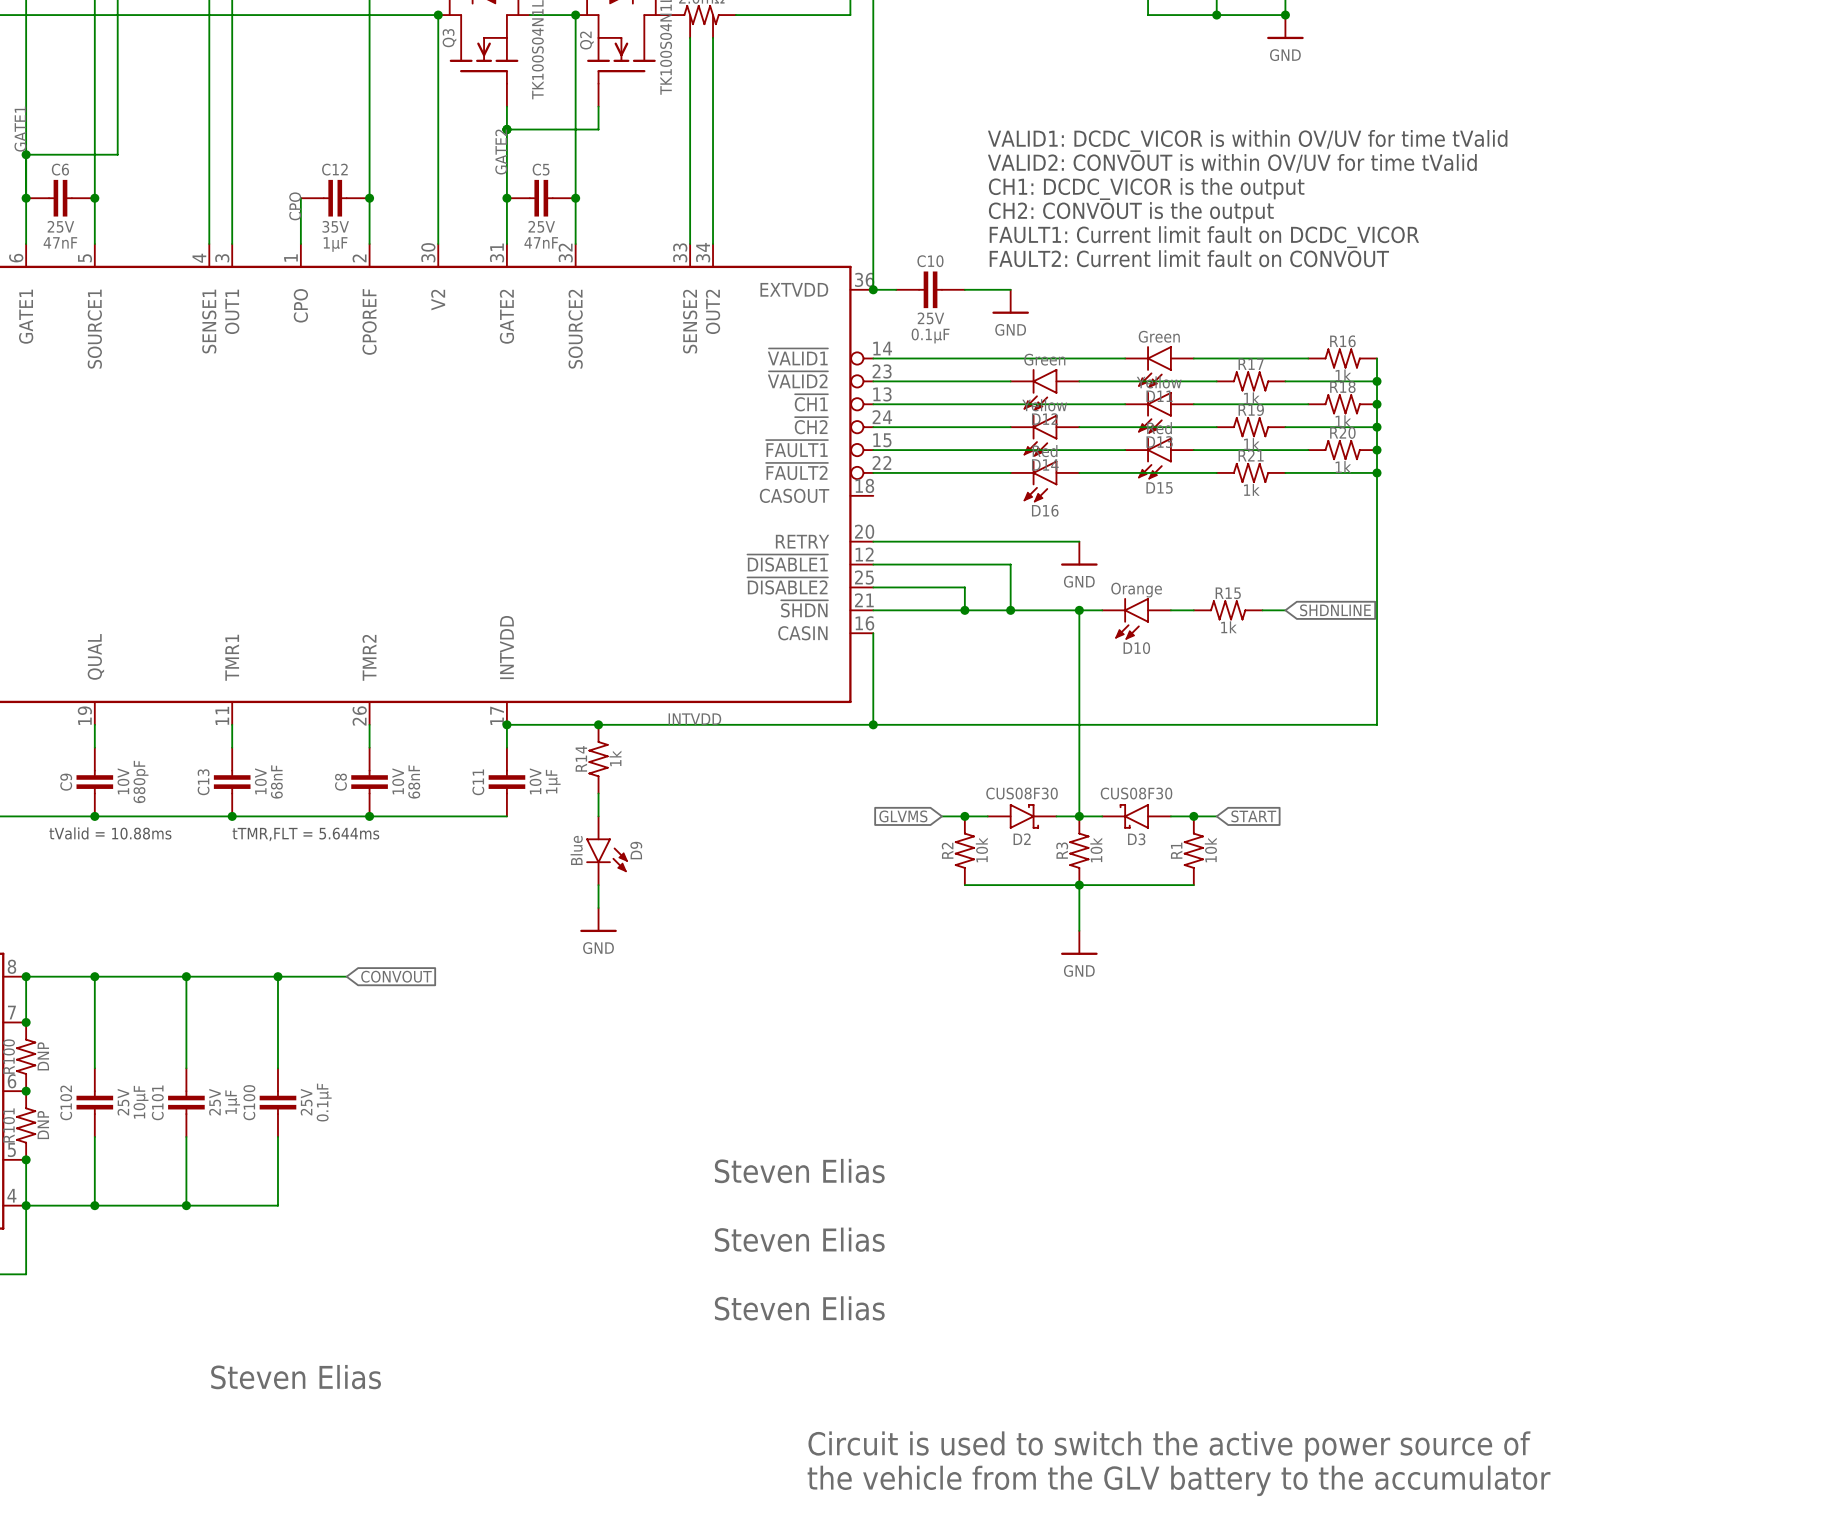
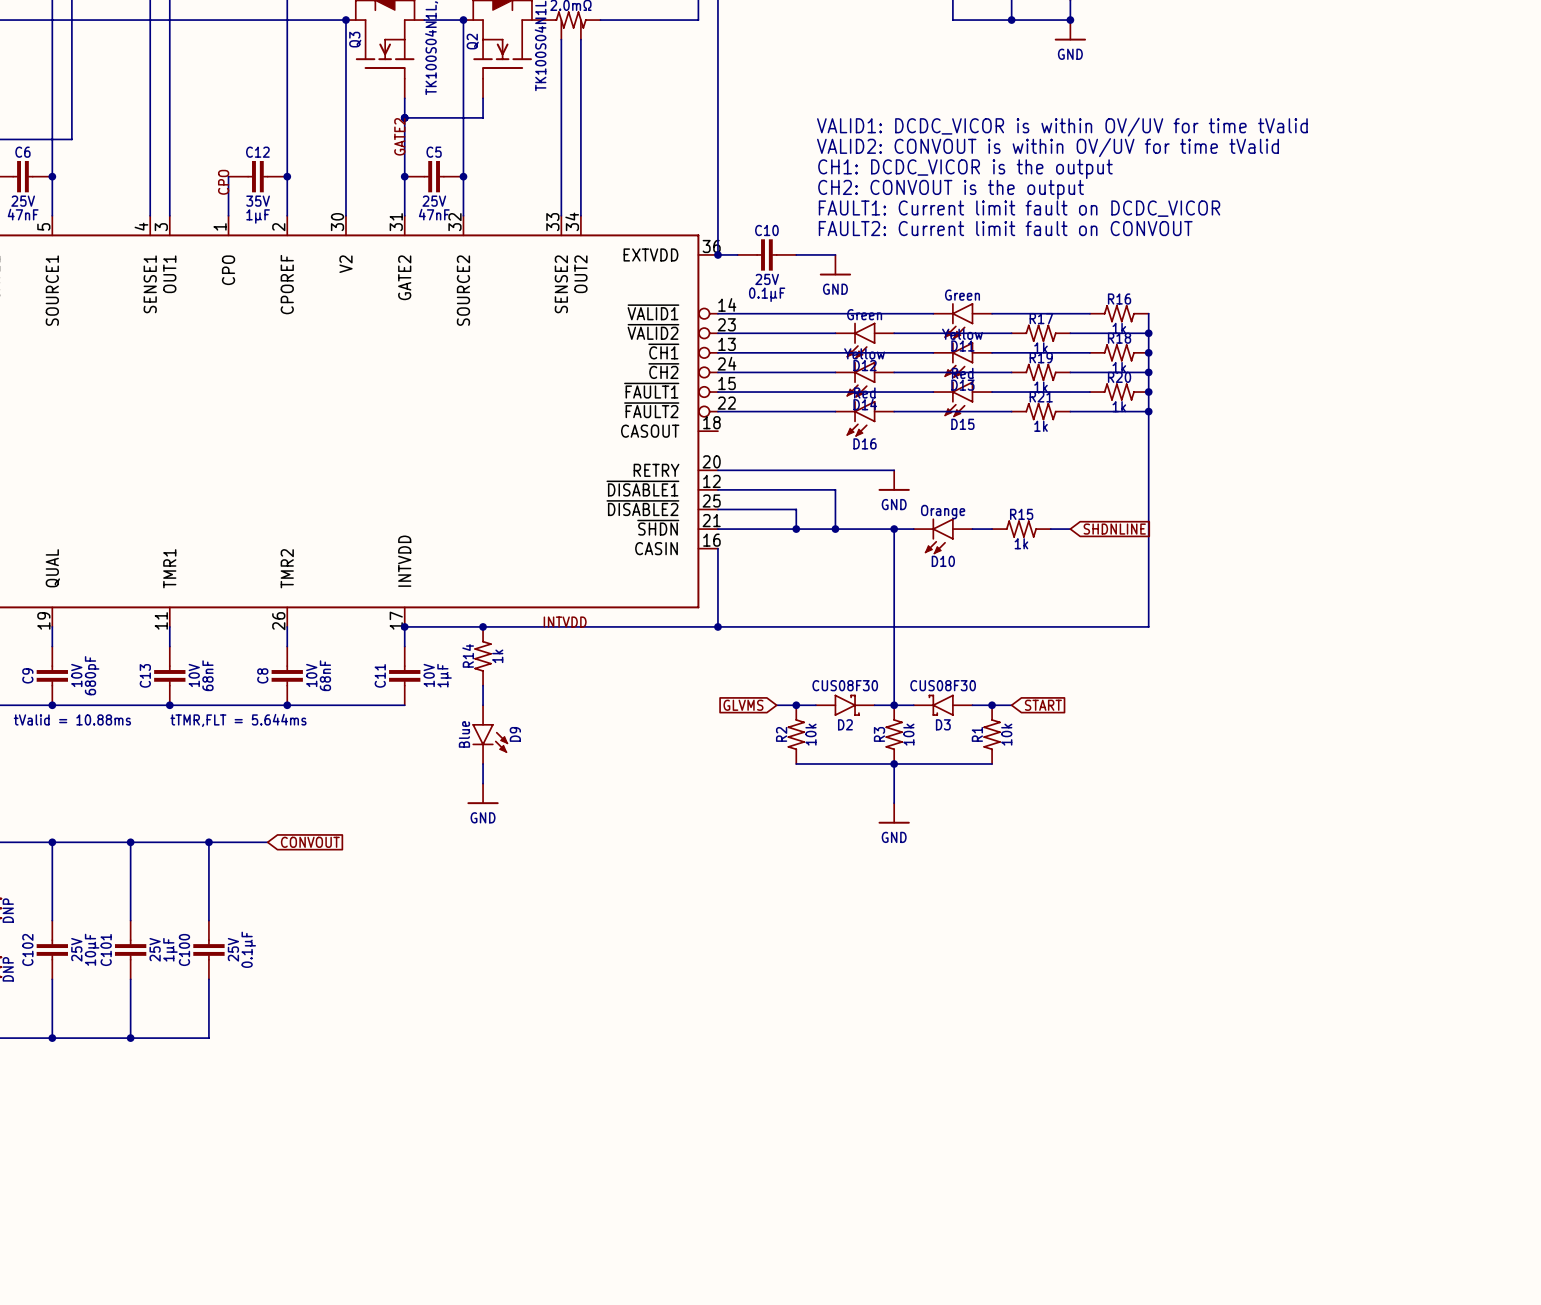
text: Steven Elias (799, 1171) -> none
text: Steven Elias (799, 1239) -> none
text: Steven Elias (799, 1308) -> none
text: Steven Elias (296, 1377) -> none
text: Circuit is used to switch the active power source of (1169, 1446) -> none
text: the vehicle from the GLV battery to the accumulator (1179, 1480) -> none

